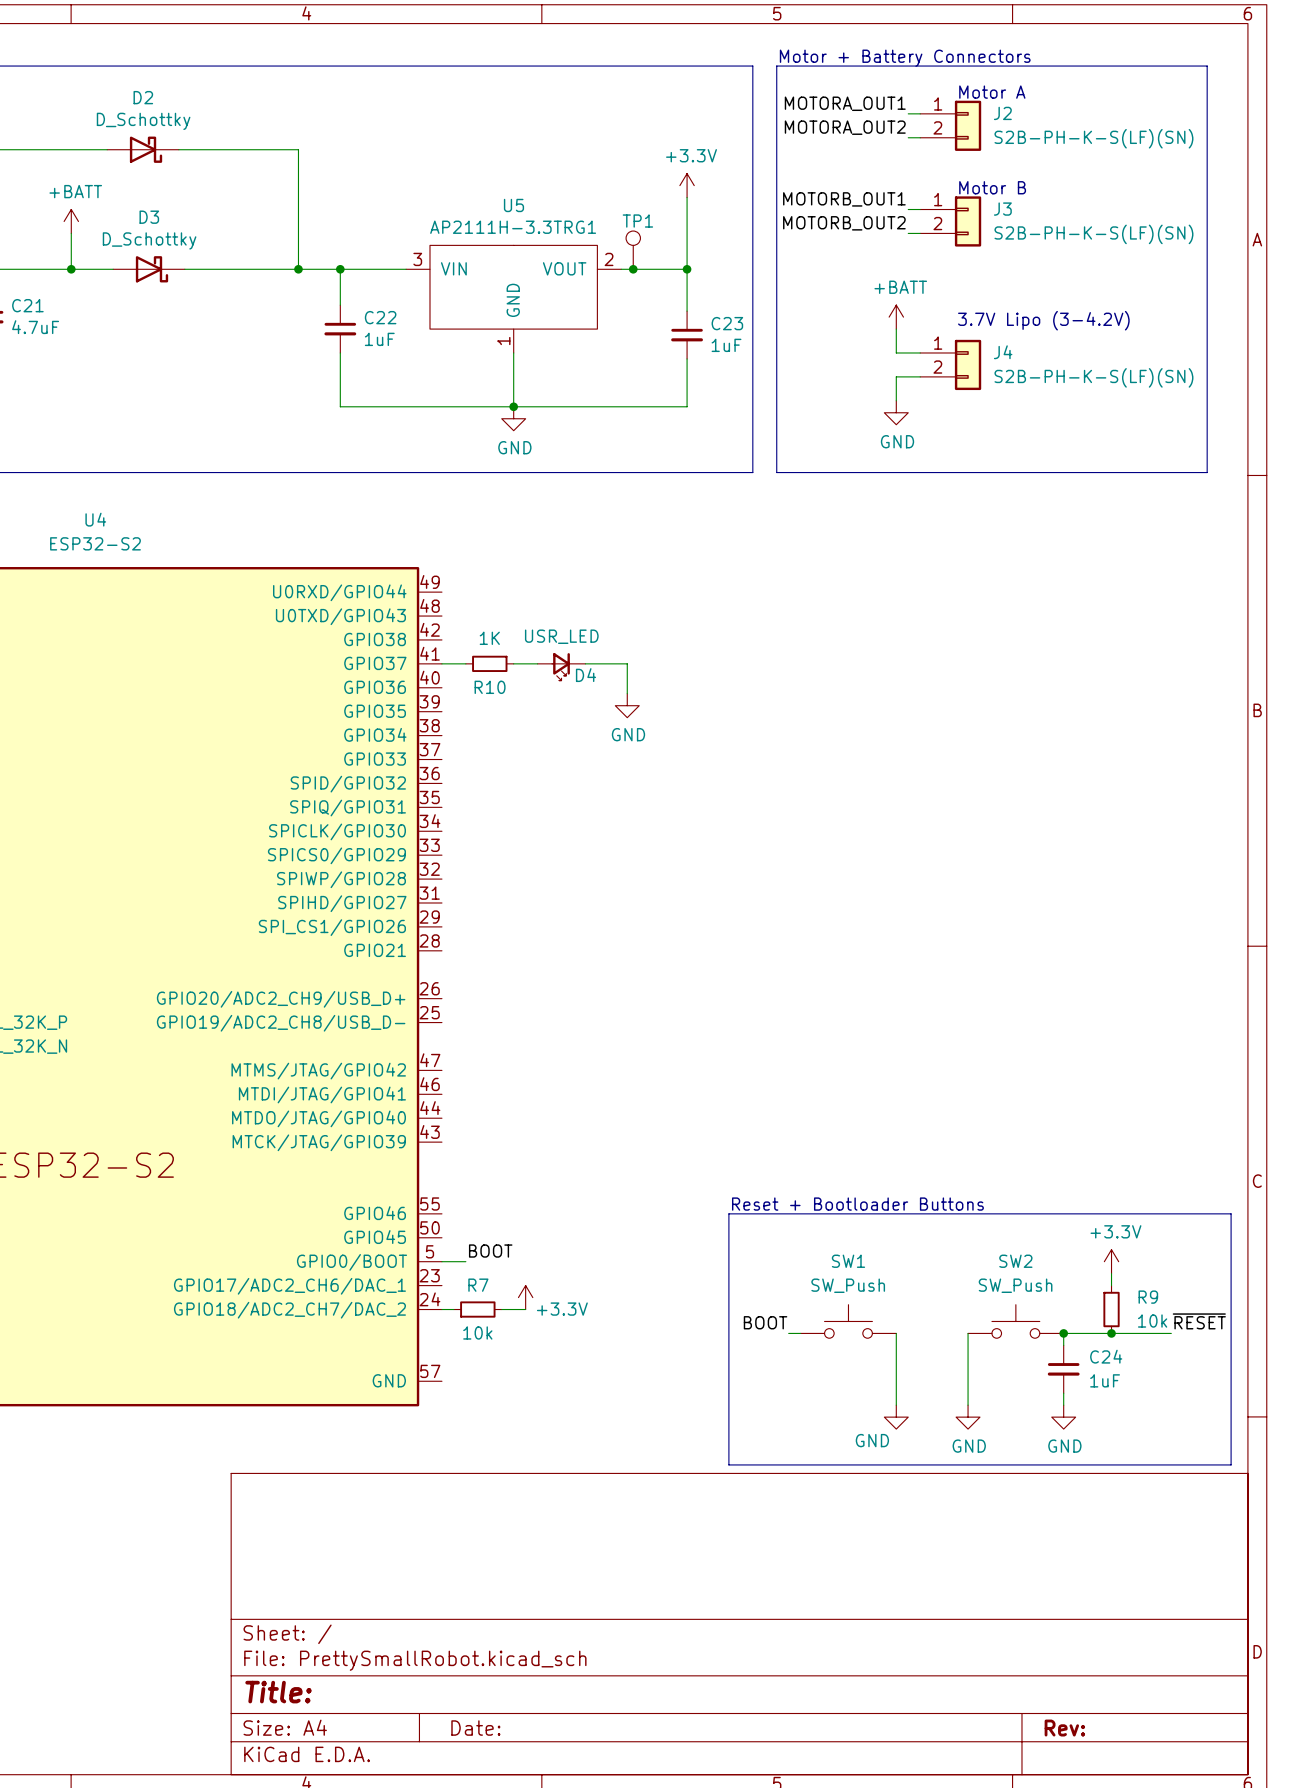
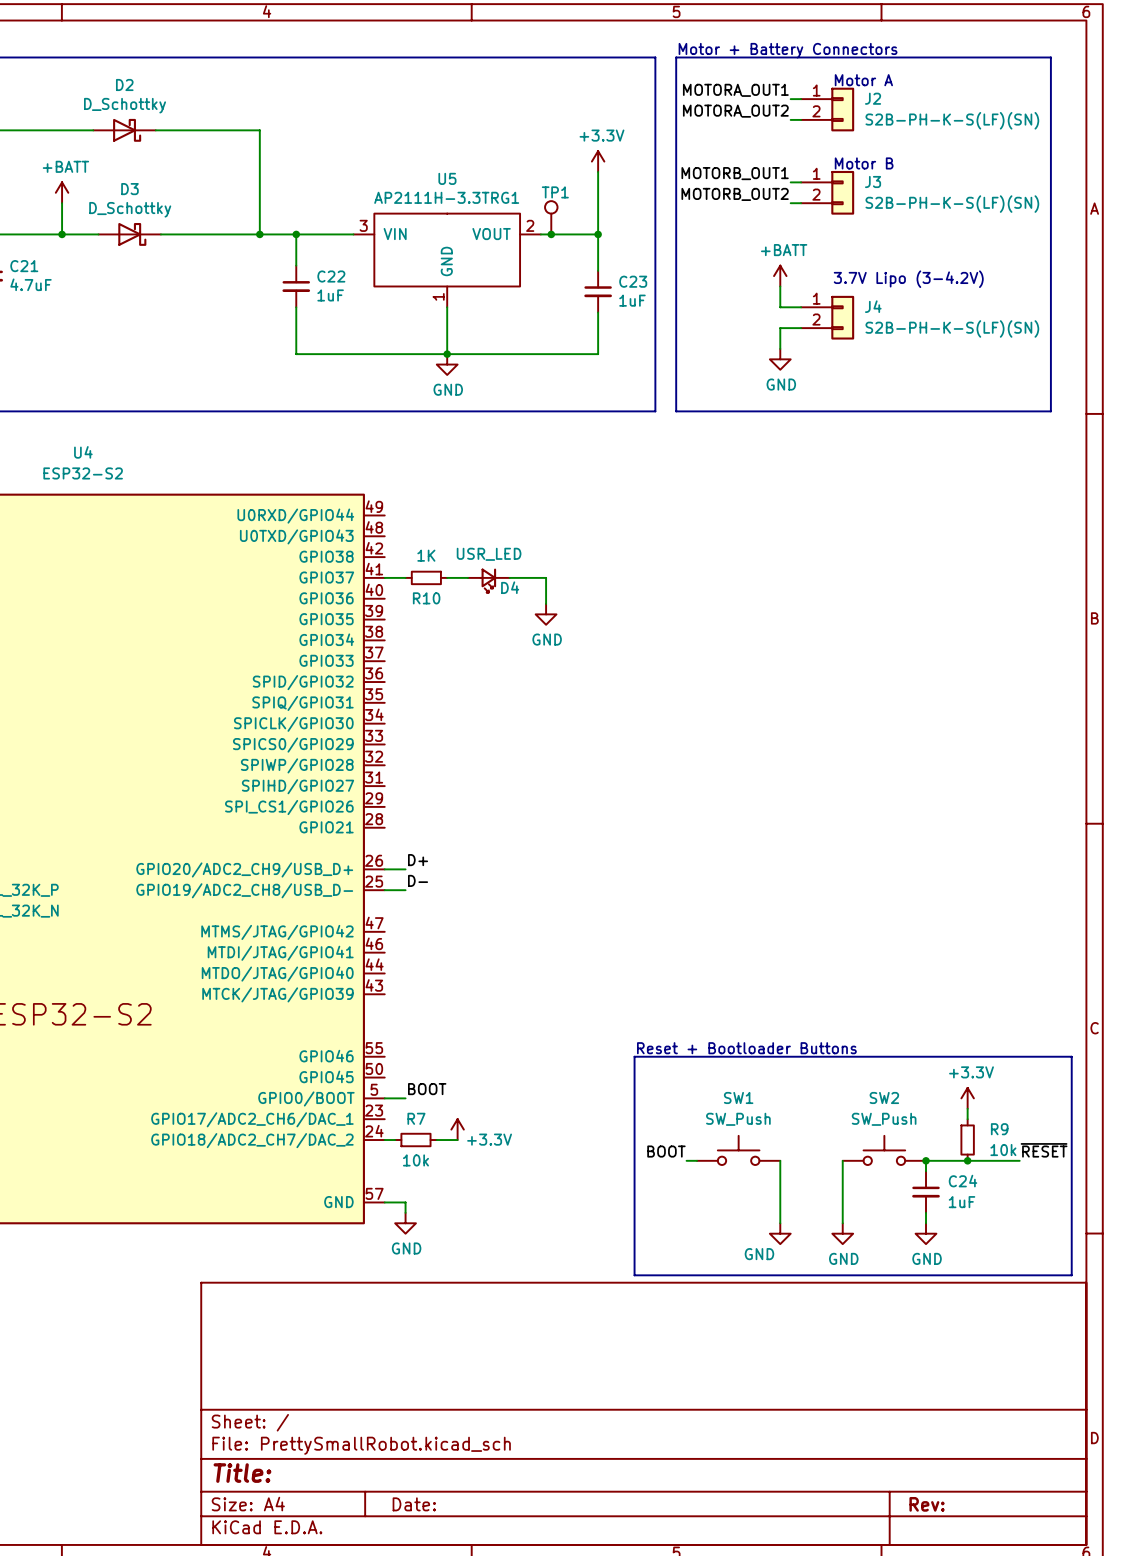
label: none -> D+ (418, 860)
wire: none -> (384, 869) (405, 869)
label: none -> D- (418, 880)
wire: none -> (384, 890) (405, 890)
wire: none -> (384, 1202) (405, 1202) (405, 1212)
power symbol: none -> GND (405, 1223)

